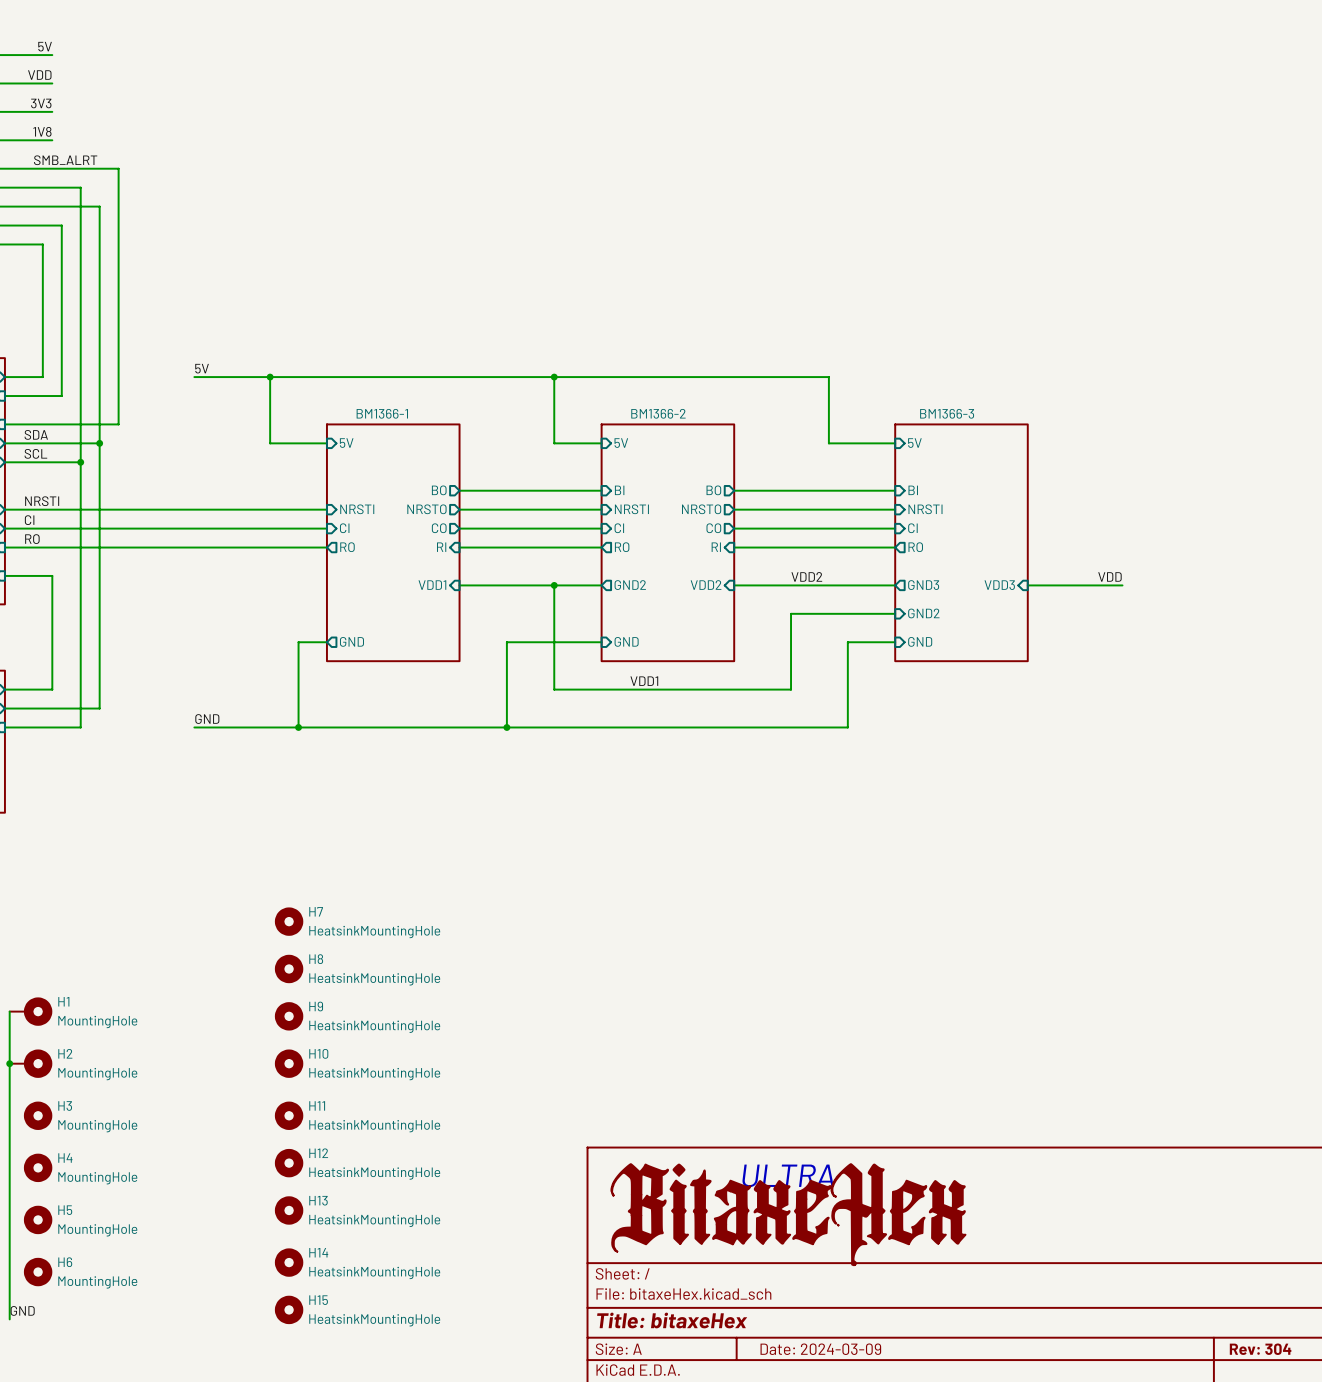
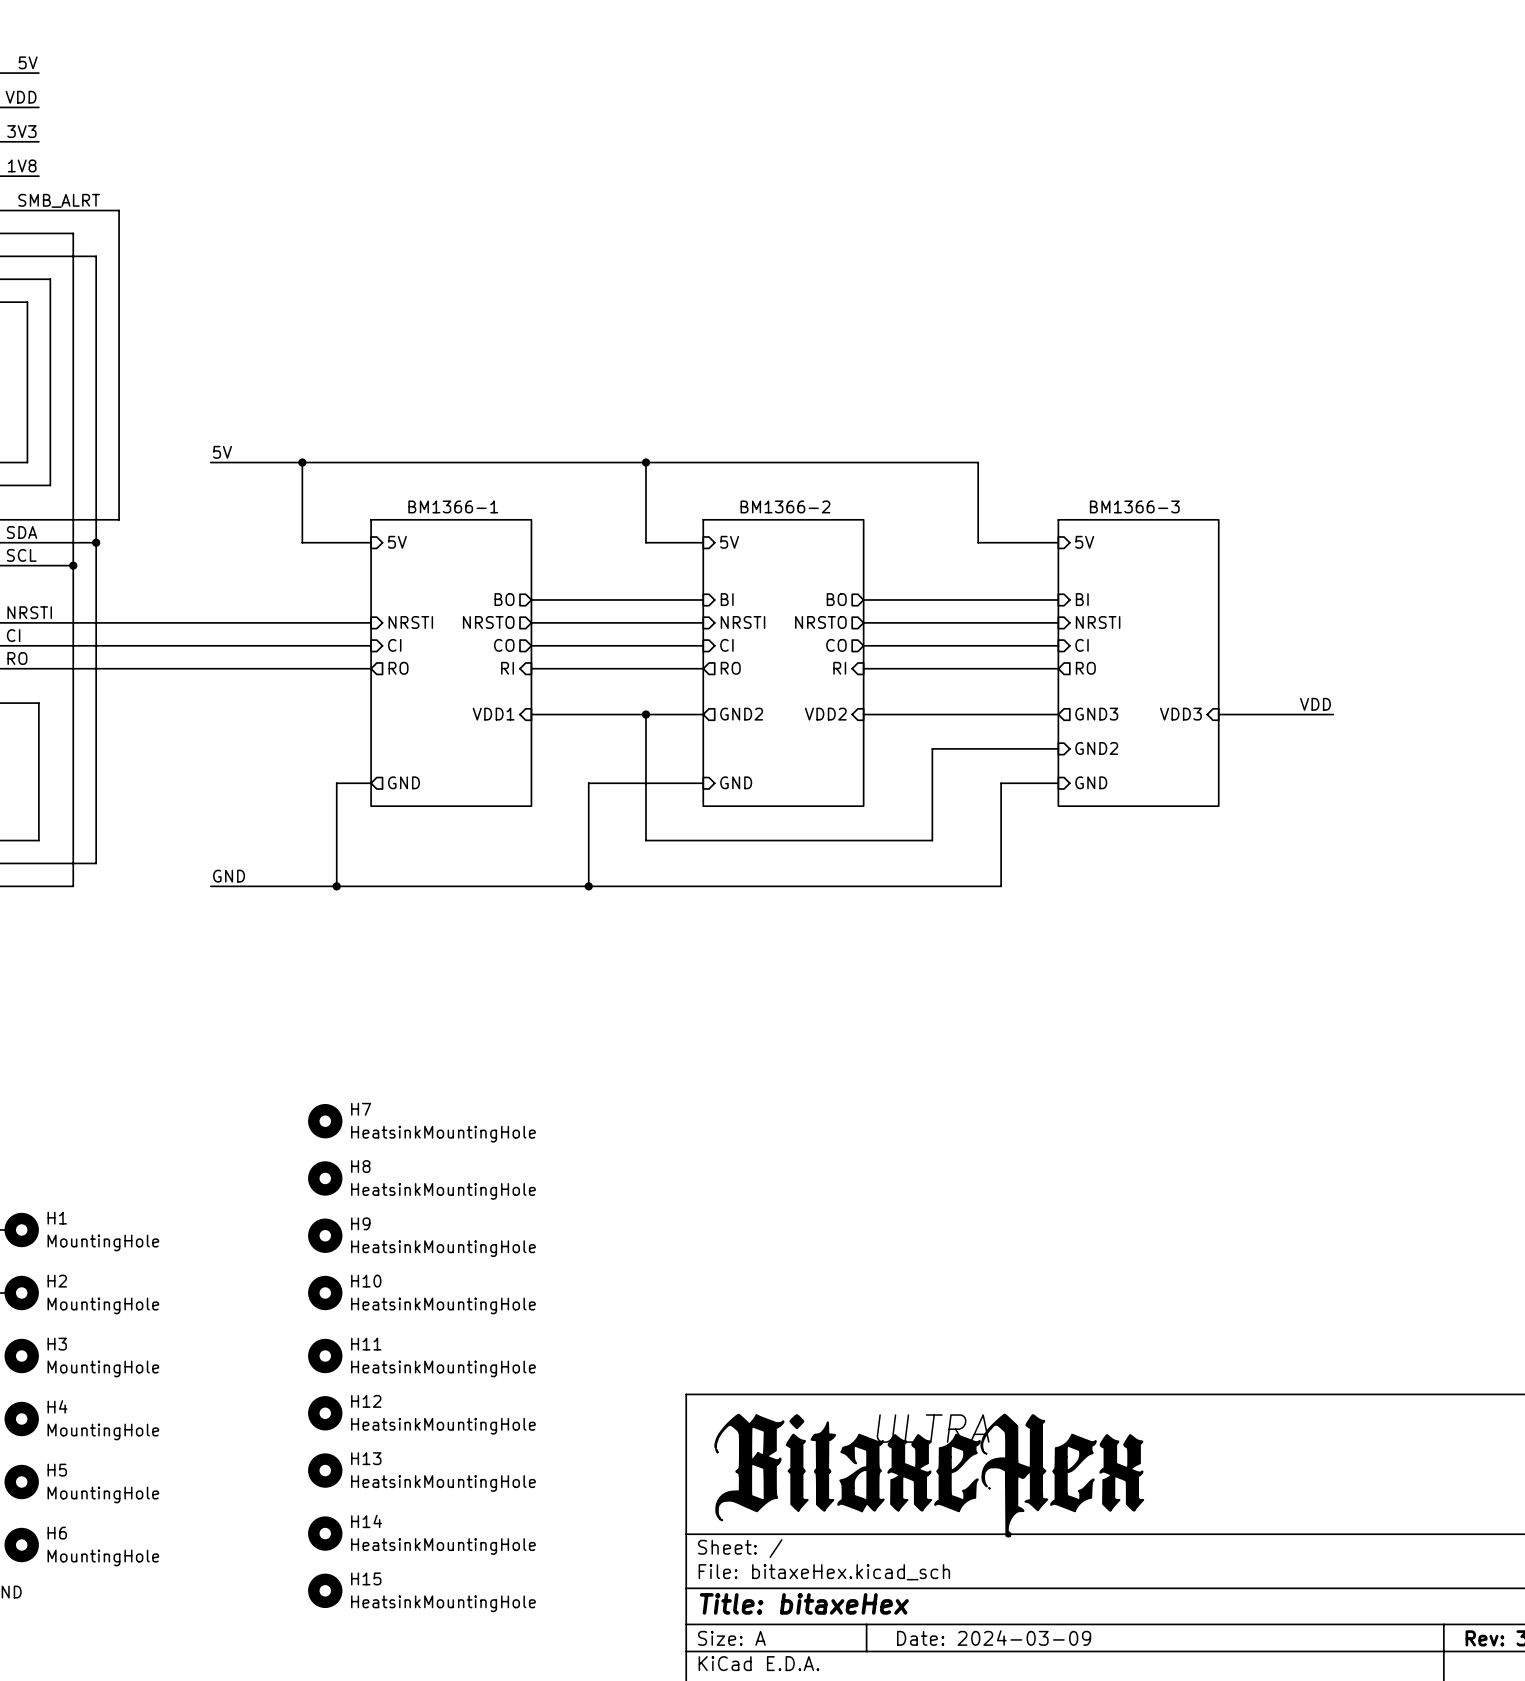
label: VDD2 (806, 576) -> none
label: VDD1 (644, 681) -> none

